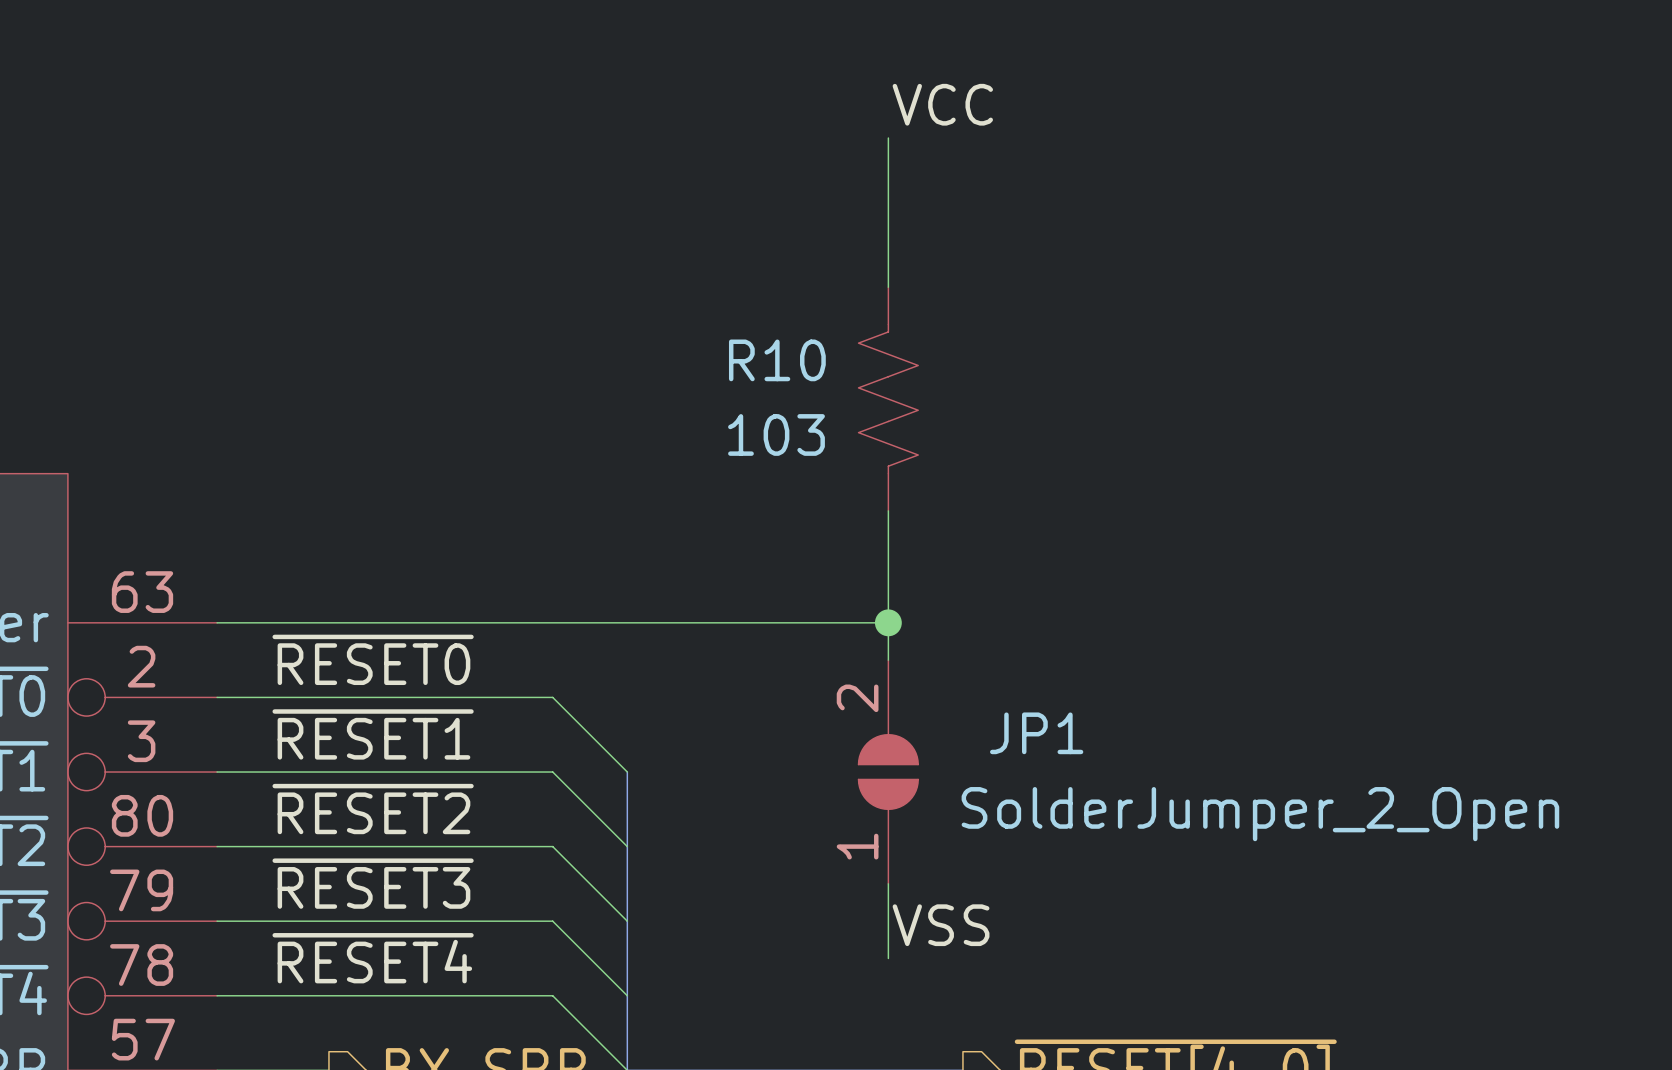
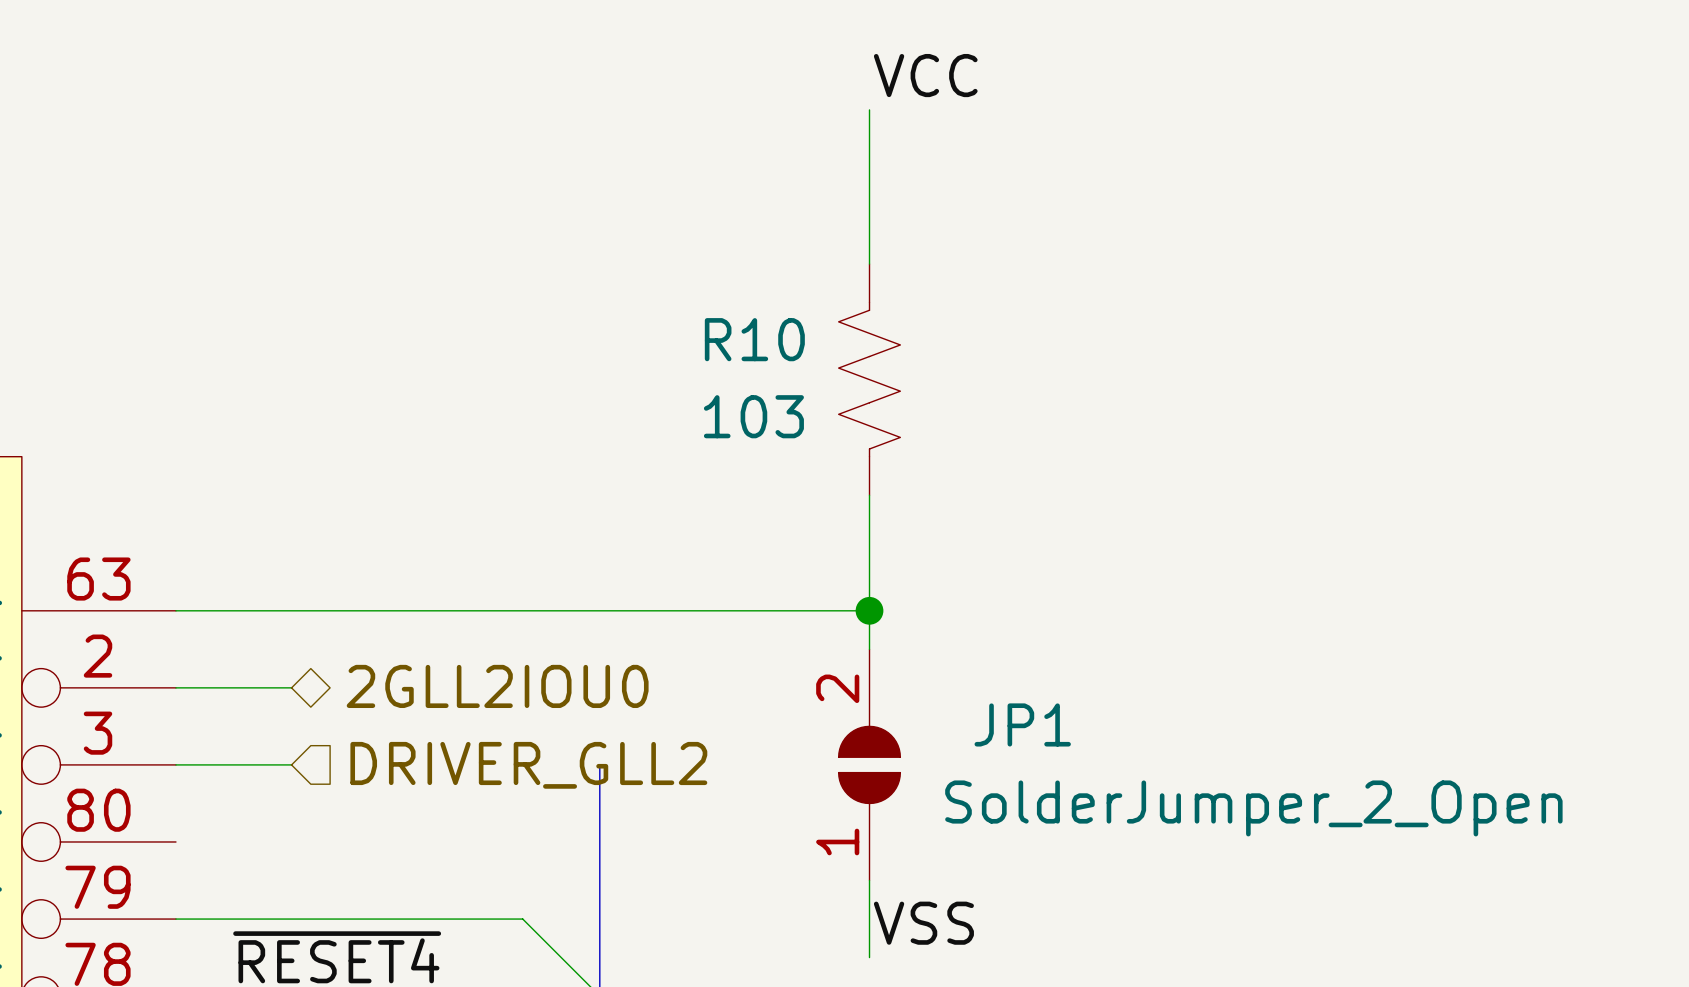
label: ~{RESET0} (373, 659) -> none
hierarchical label: none -> 2GLL2IOU0 (497, 686)
wire: (328, 697) (552, 697) (627, 772) -> none
label: ~{RESET1} (373, 734) -> none
wire: (328, 772) (552, 772) (627, 846) -> none
hierarchical label: none -> DRIVER_GLL2 (528, 765)
label: ~{RESET2} (373, 809) -> none
wire: (217, 846) (552, 846) (627, 921) -> none
label: ~{RESET3} (373, 883) -> none

